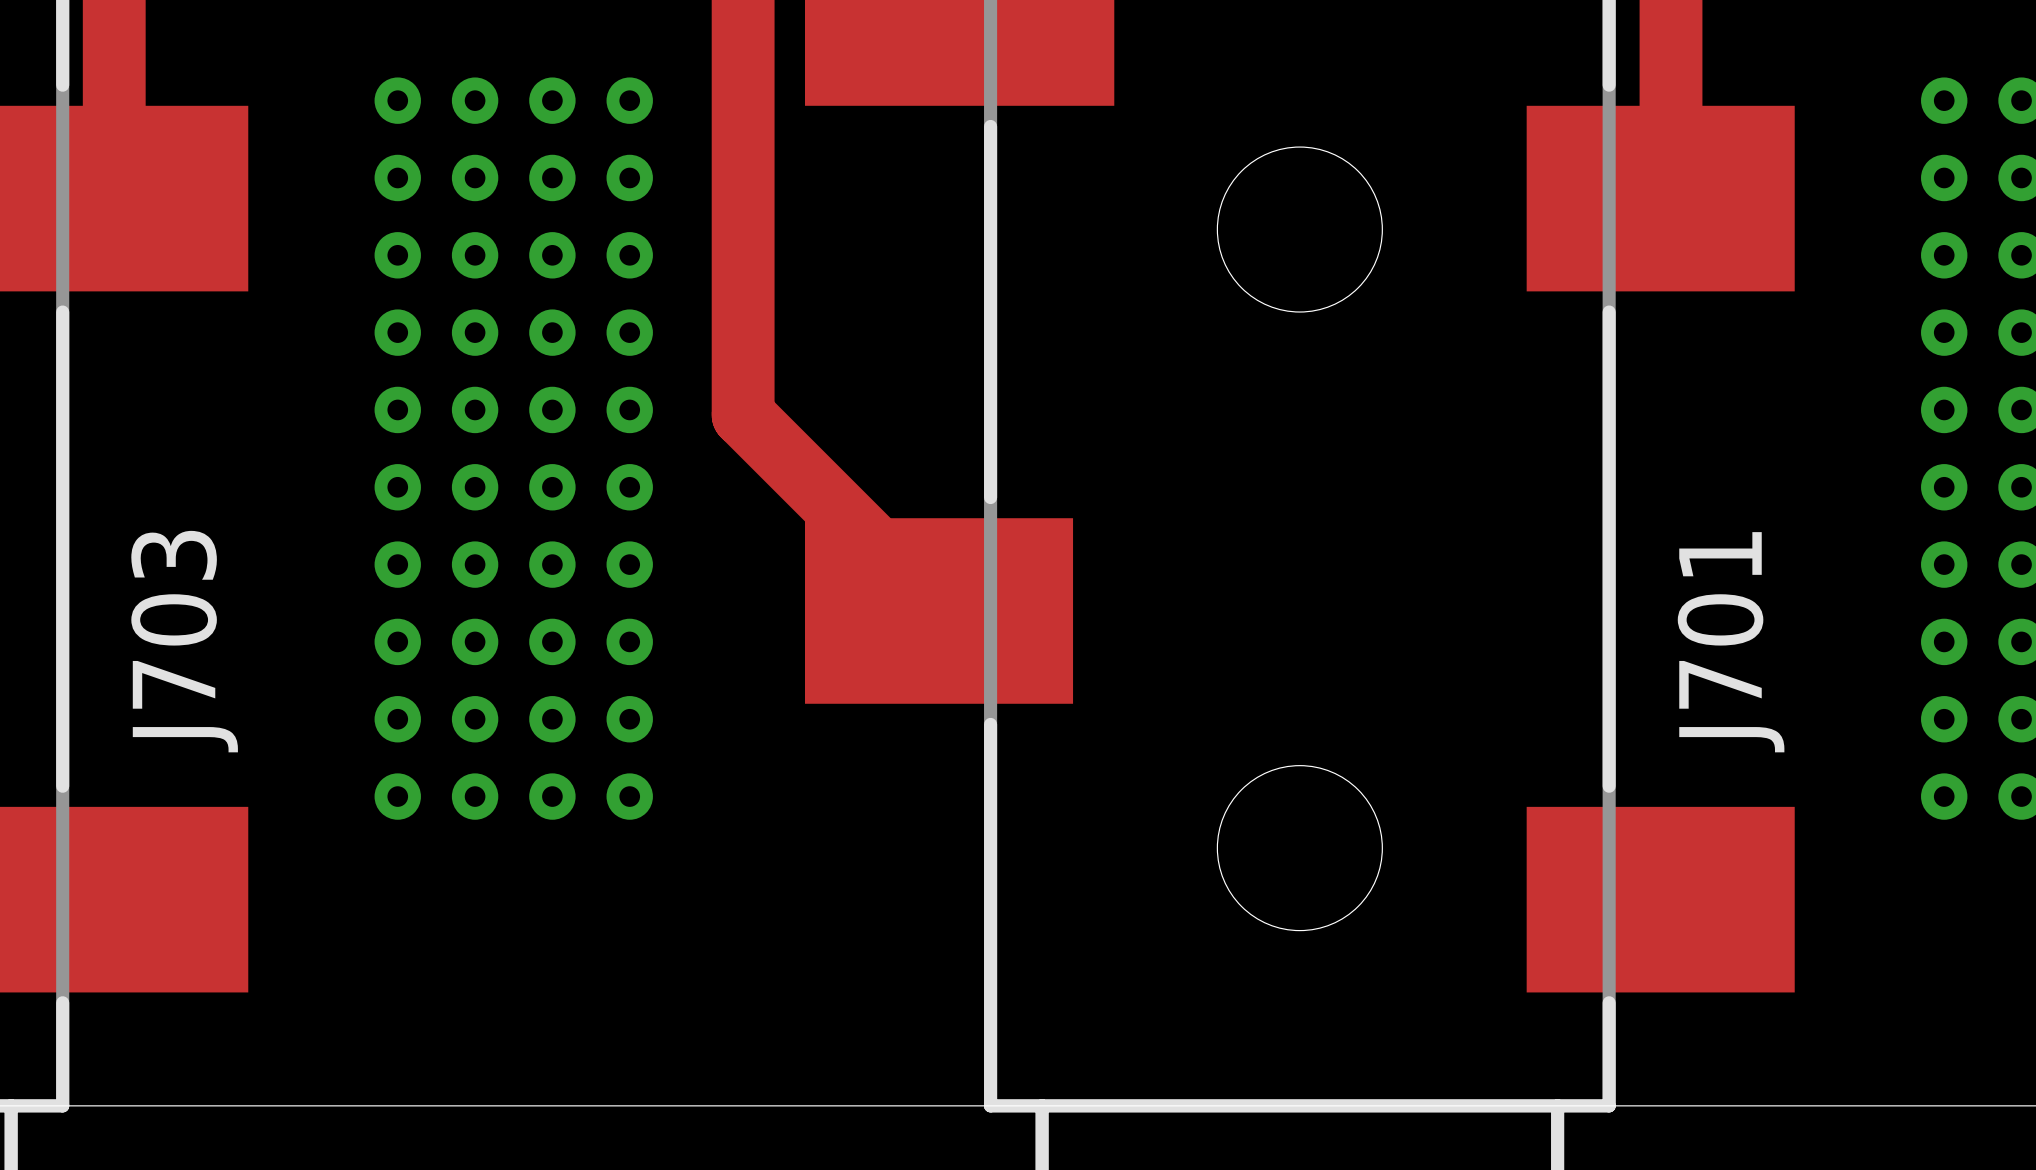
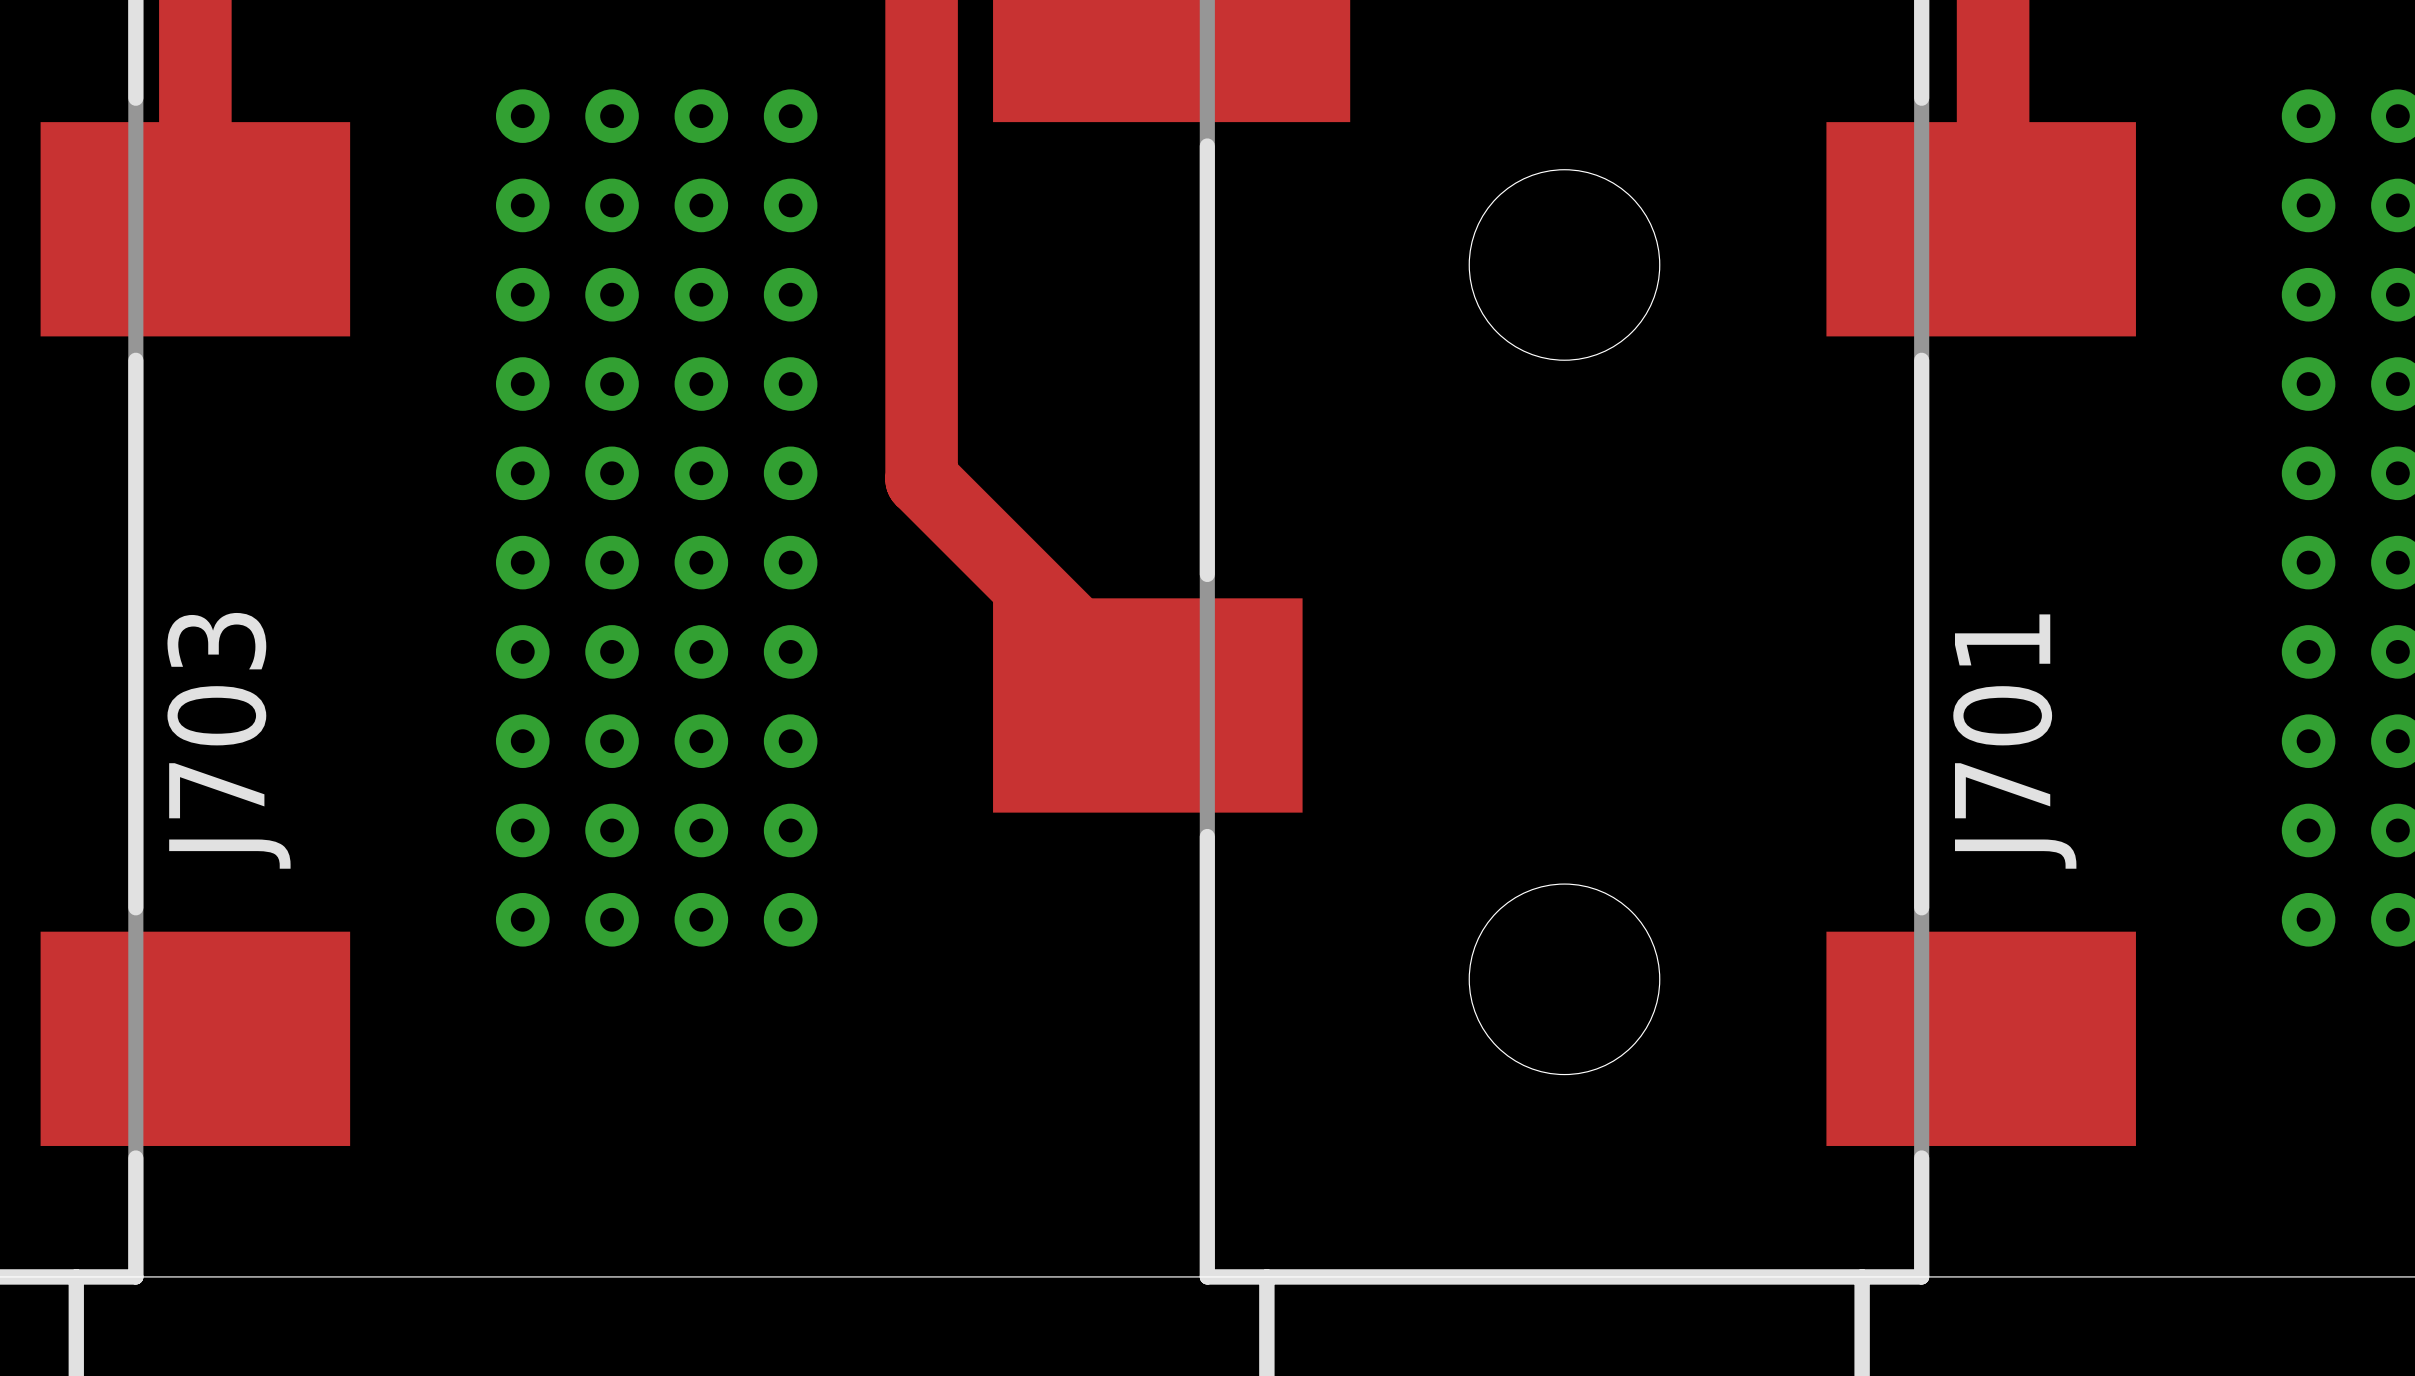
J703 name position: J703 (184, 641) -> J703 (229, 740)
J701 name position: J701 (1731, 642) -> J701 (2014, 741)

